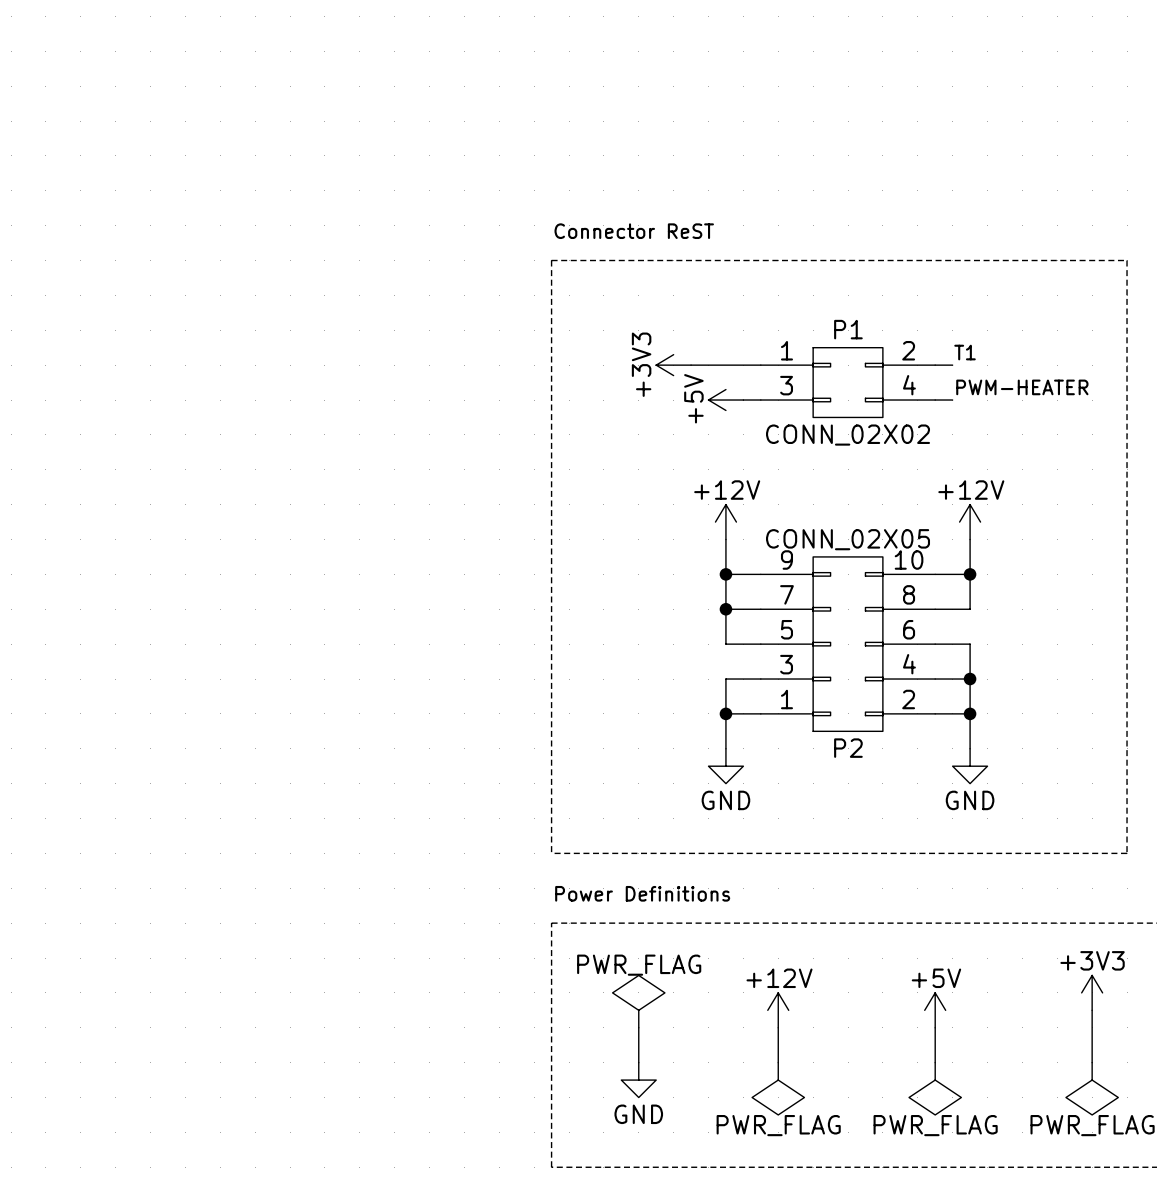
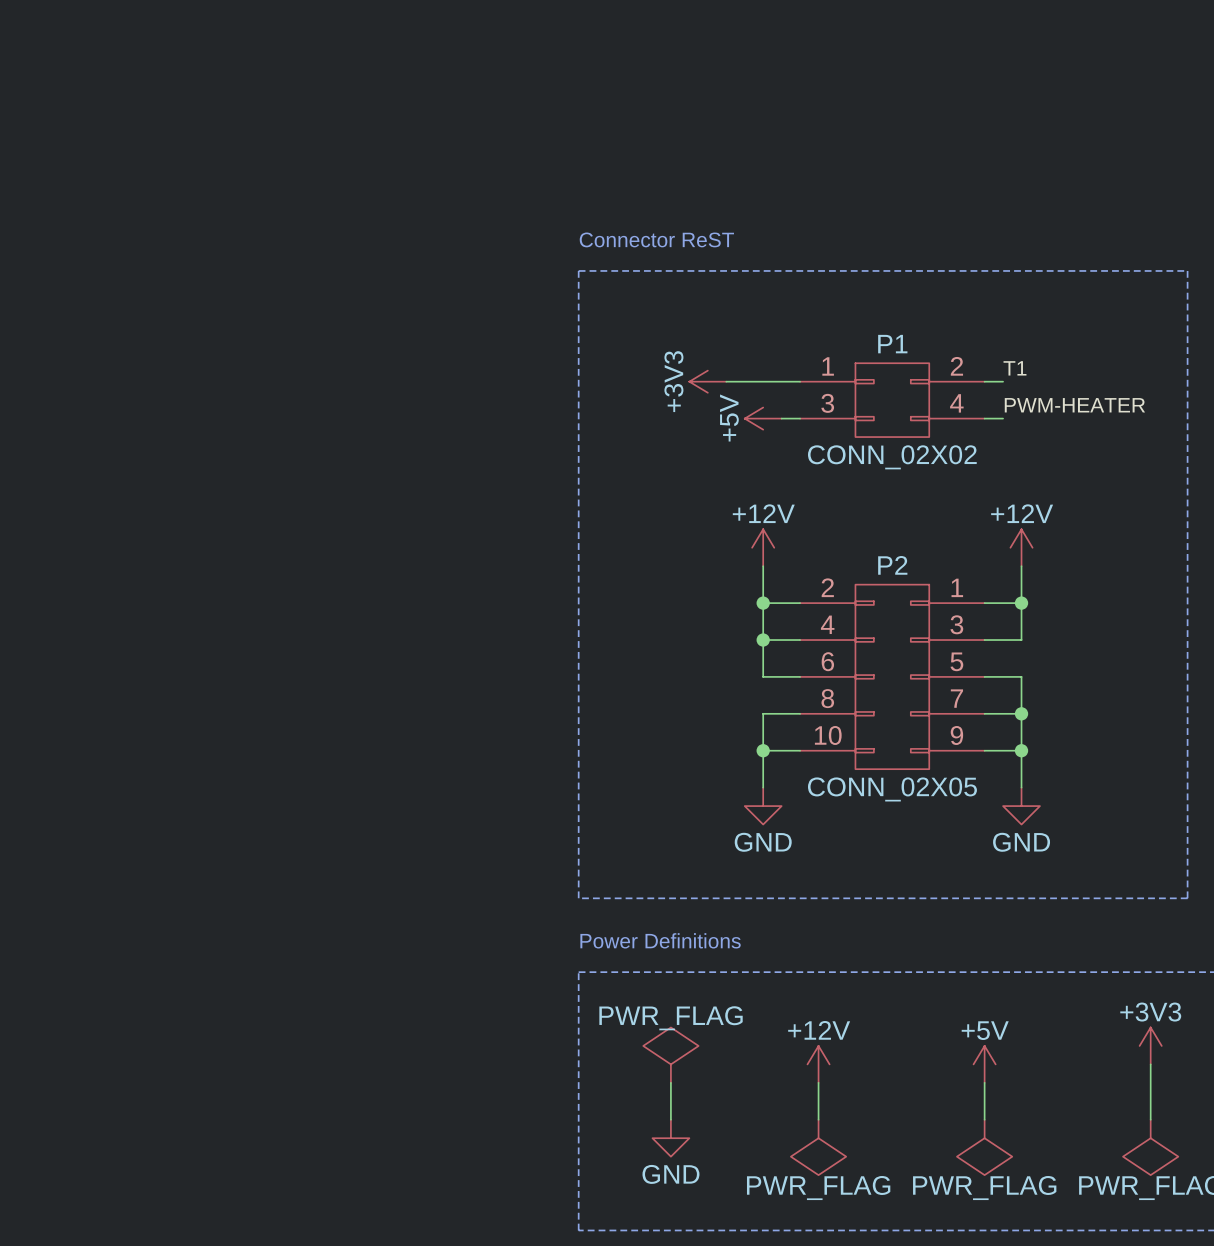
P2 rotation: 0° (848, 644) -> 180° (892, 676)

